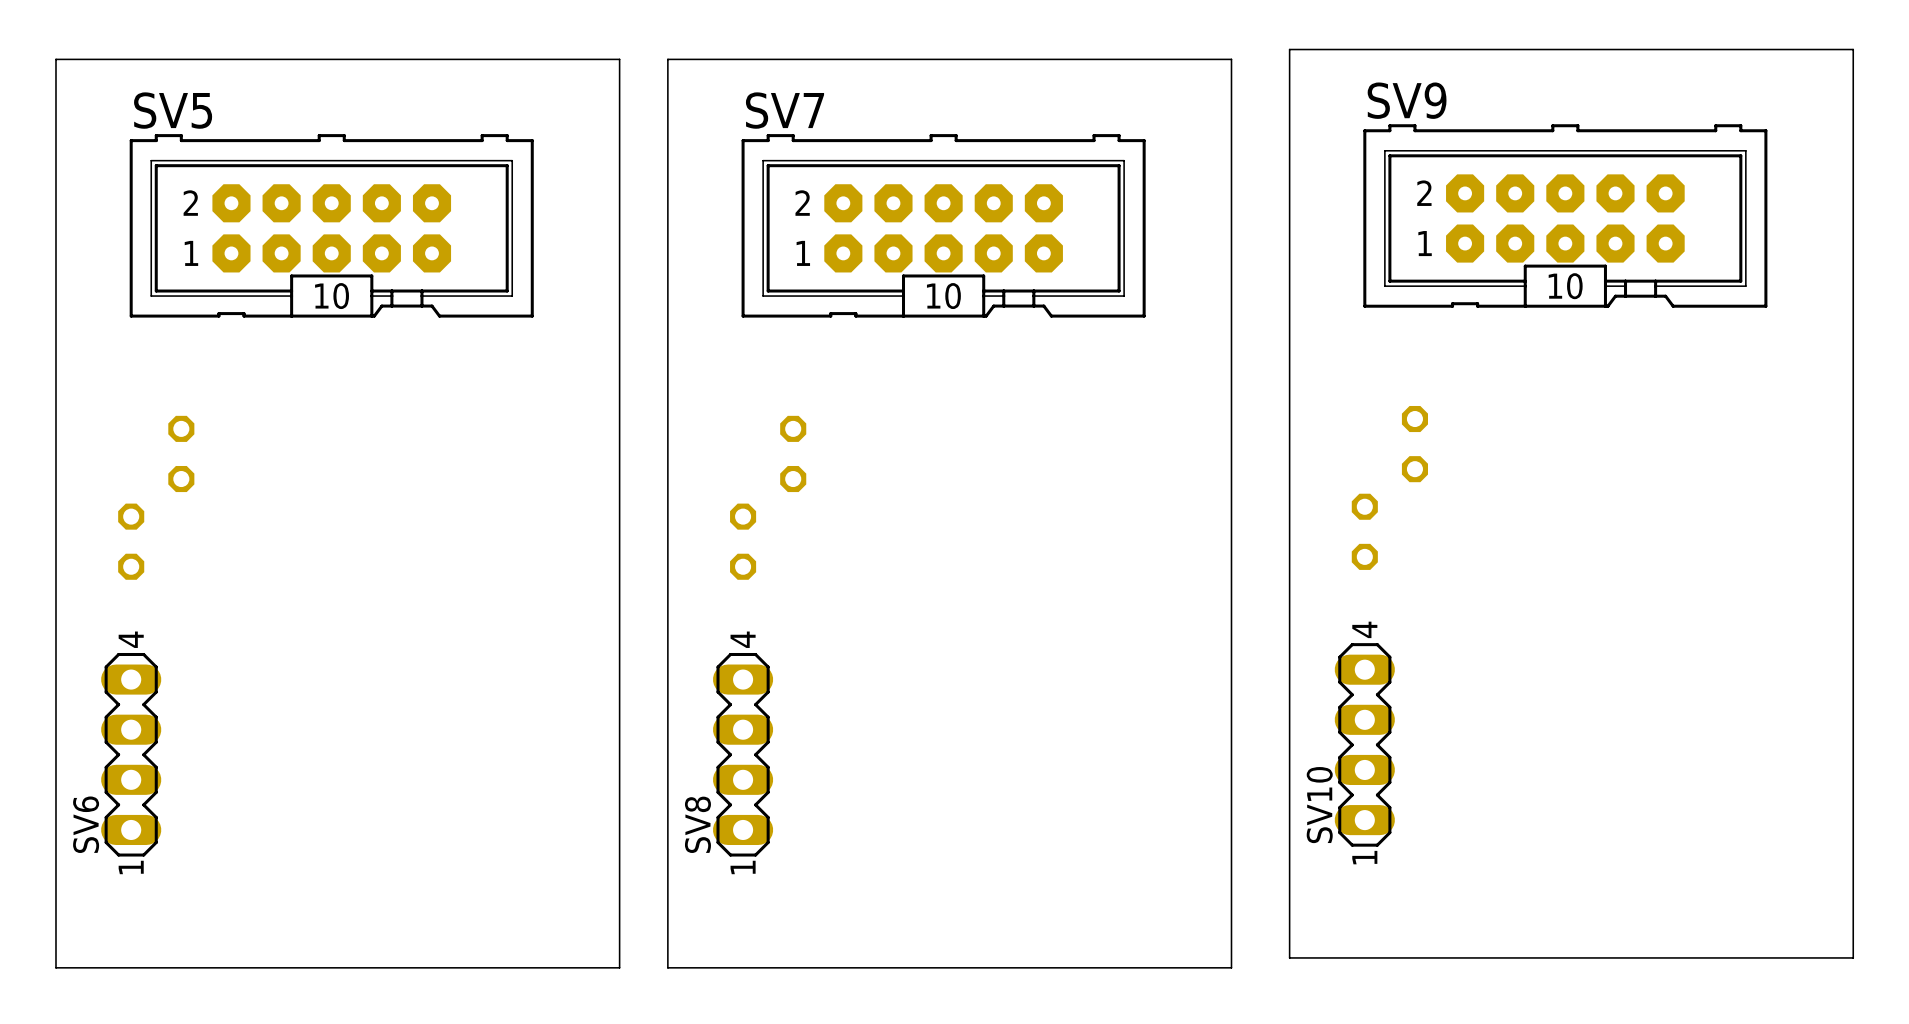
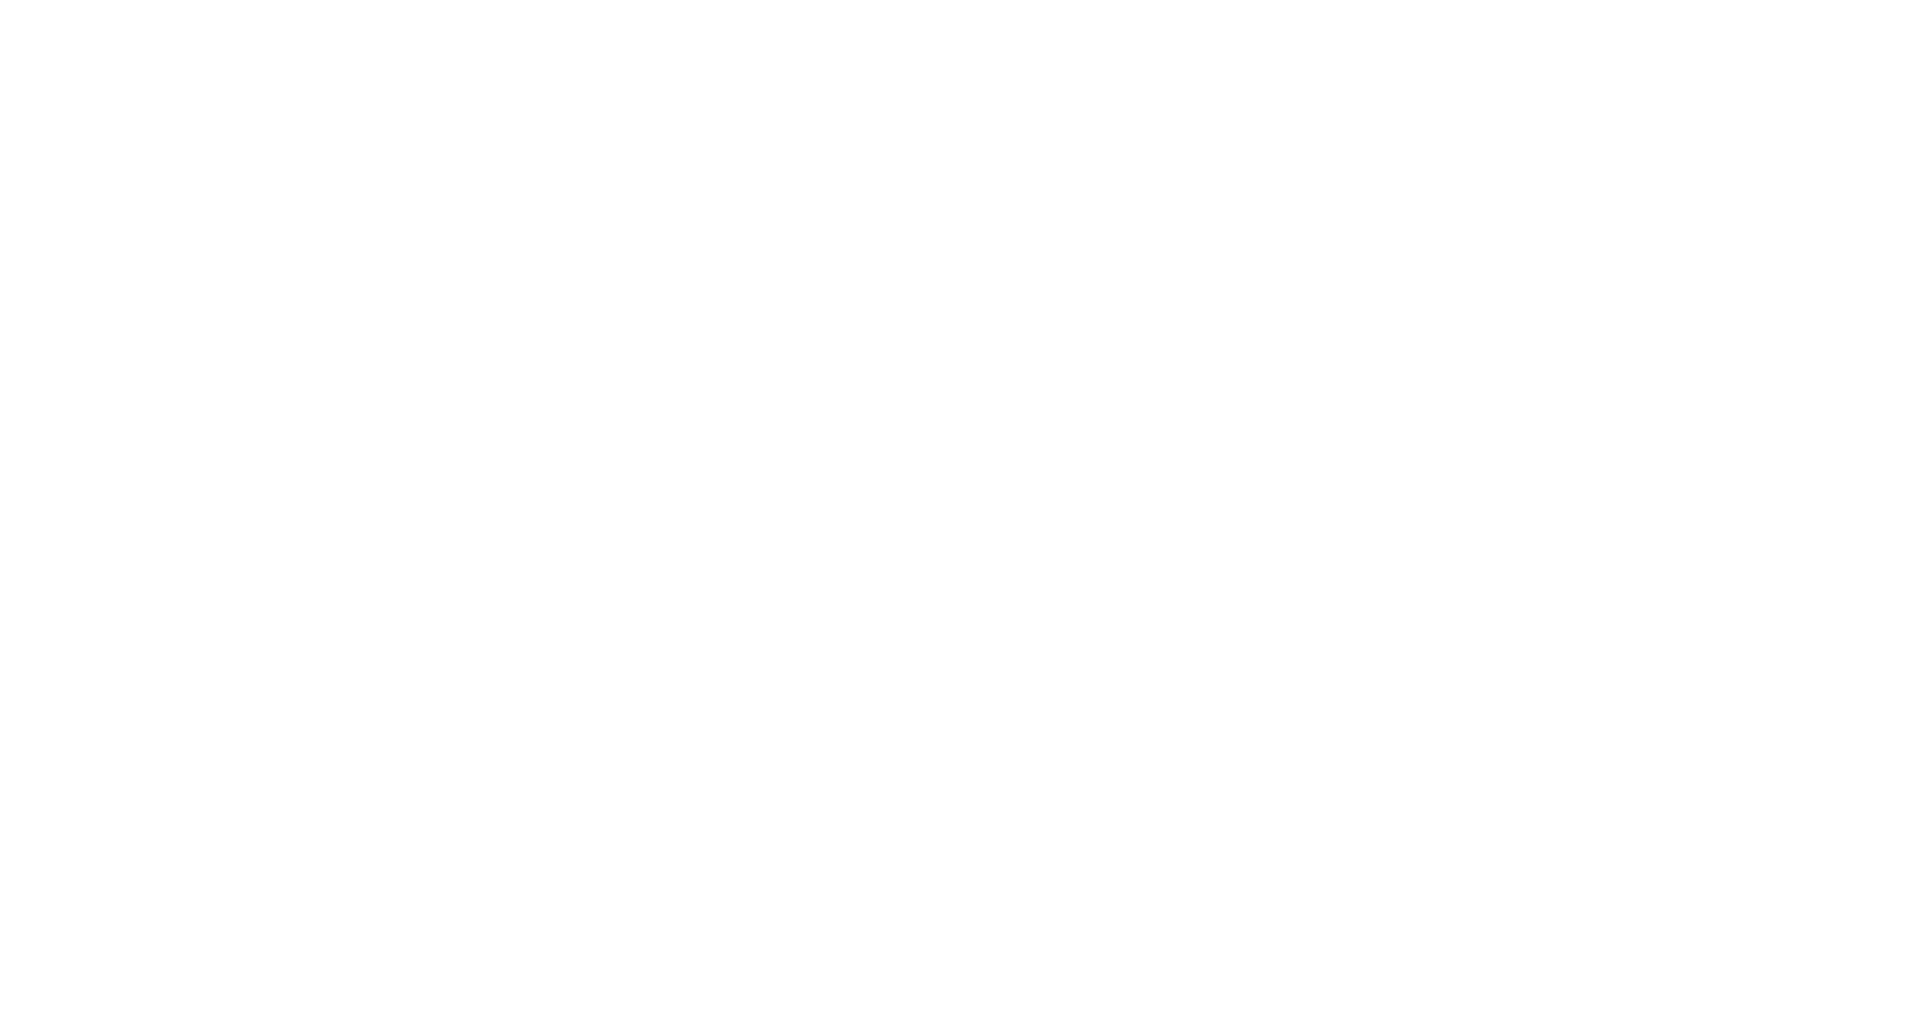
board edge: (1289, 49) (1853, 49) (1853, 957) (1289, 957) (1289, 49) -> none
board edge: (55, 59) (619, 59) (619, 967) (55, 967) (55, 59) -> none
board edge: (667, 59) (1231, 59) (1231, 967) (667, 967) (667, 59) -> none
SV9: (1565, 215) -> none
SV5: (331, 225) -> none
SV7: (943, 225) -> none
part: (1414, 444) -> none
part: (181, 453) -> none
part: (793, 453) -> none
part: (1364, 531) -> none
part: (131, 541) -> none
part: (743, 541) -> none
SV10: (1364, 744) -> none
SV6: (131, 754) -> none
SV8: (743, 754) -> none

